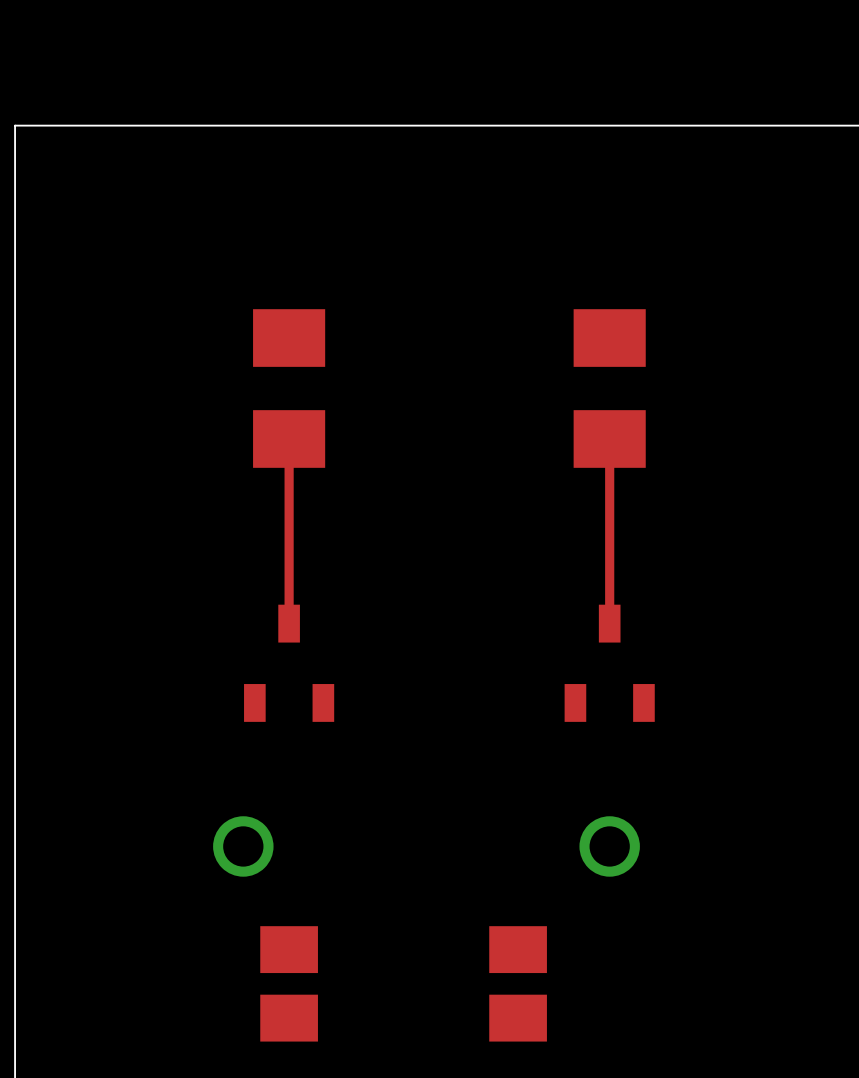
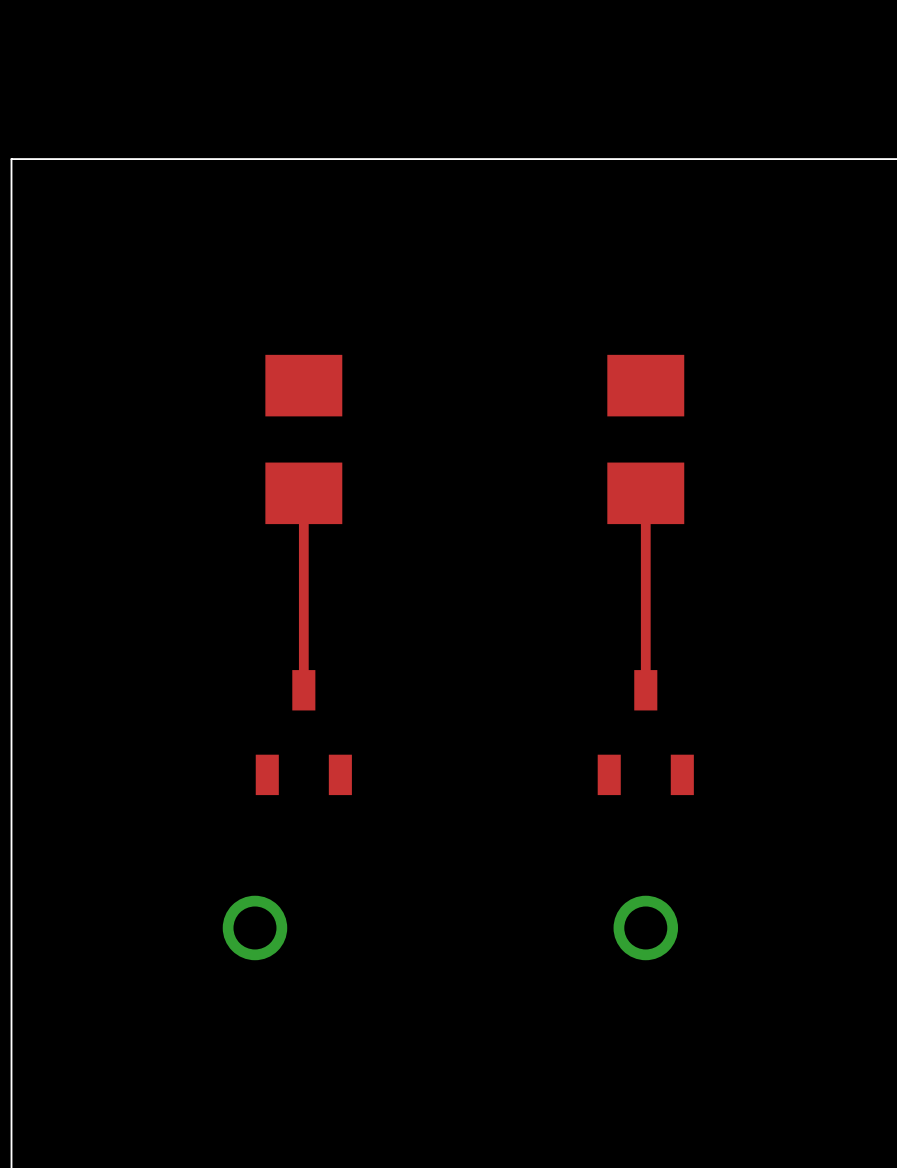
part: (289, 983) -> none
part: (518, 983) -> none

